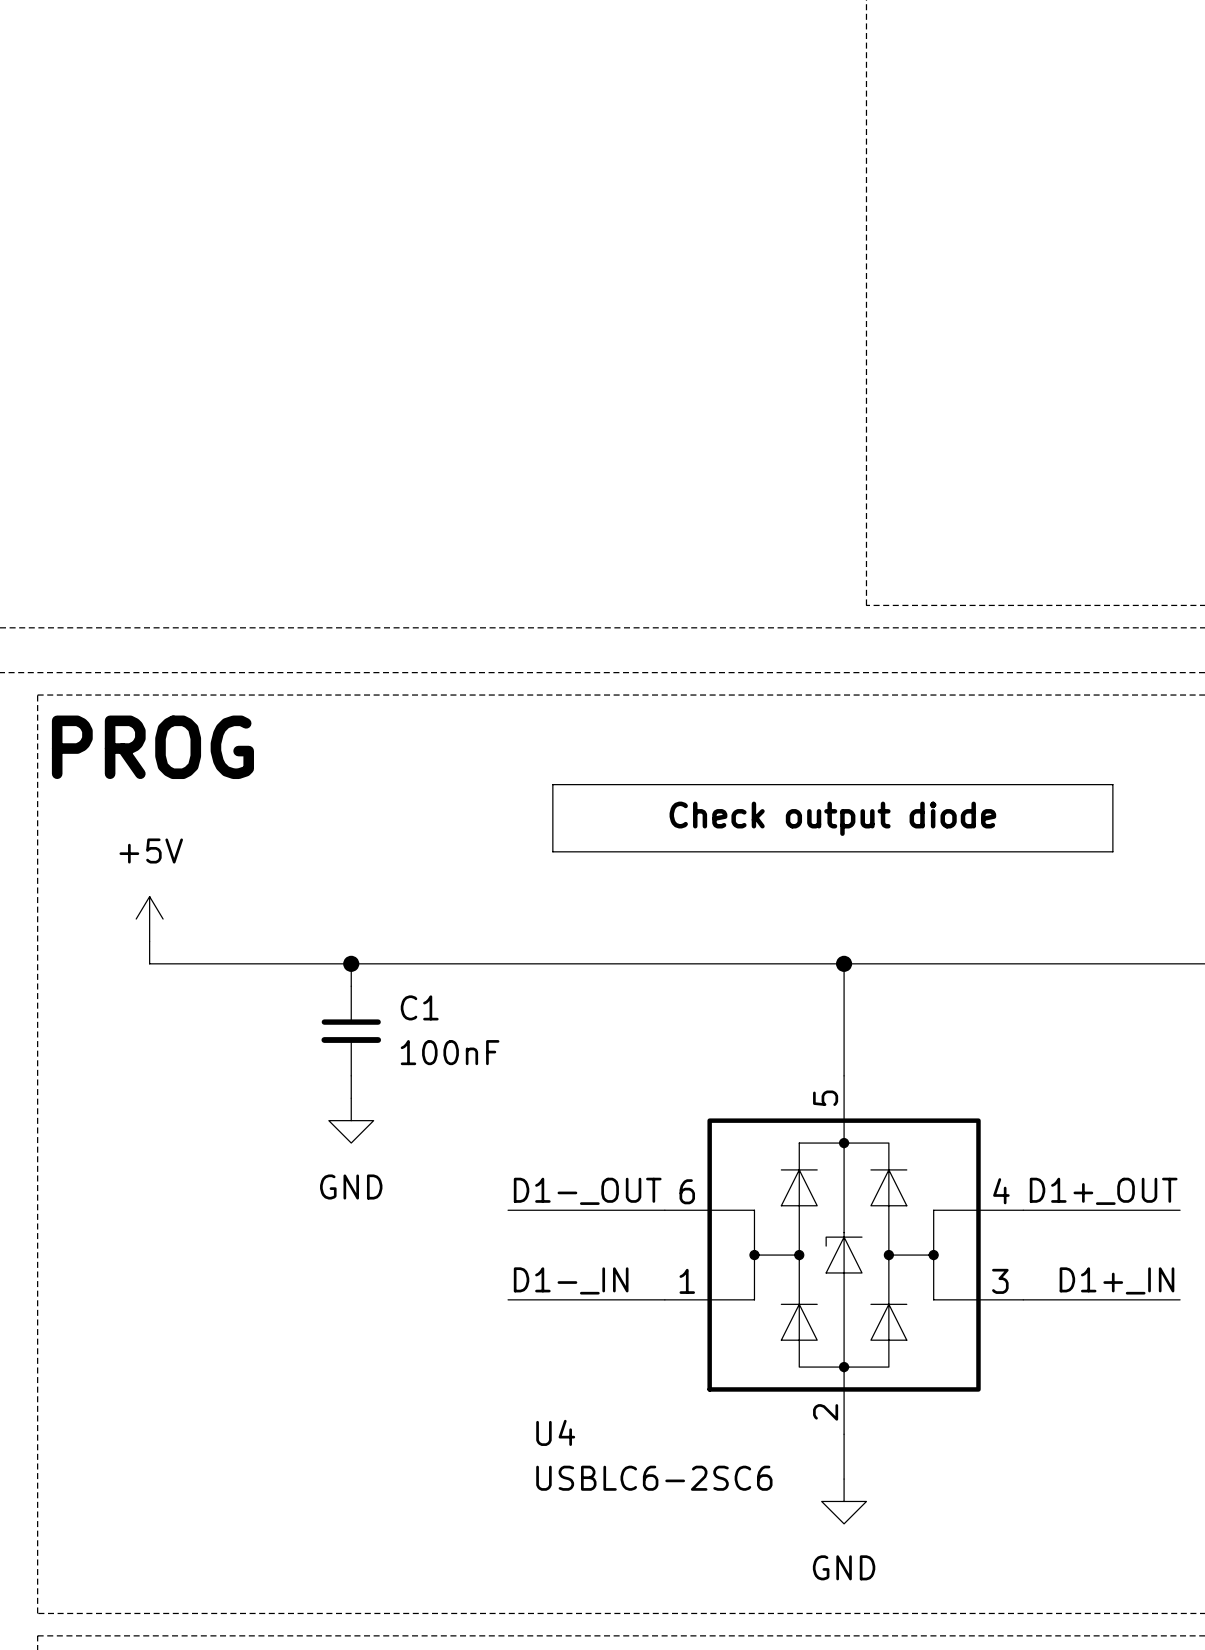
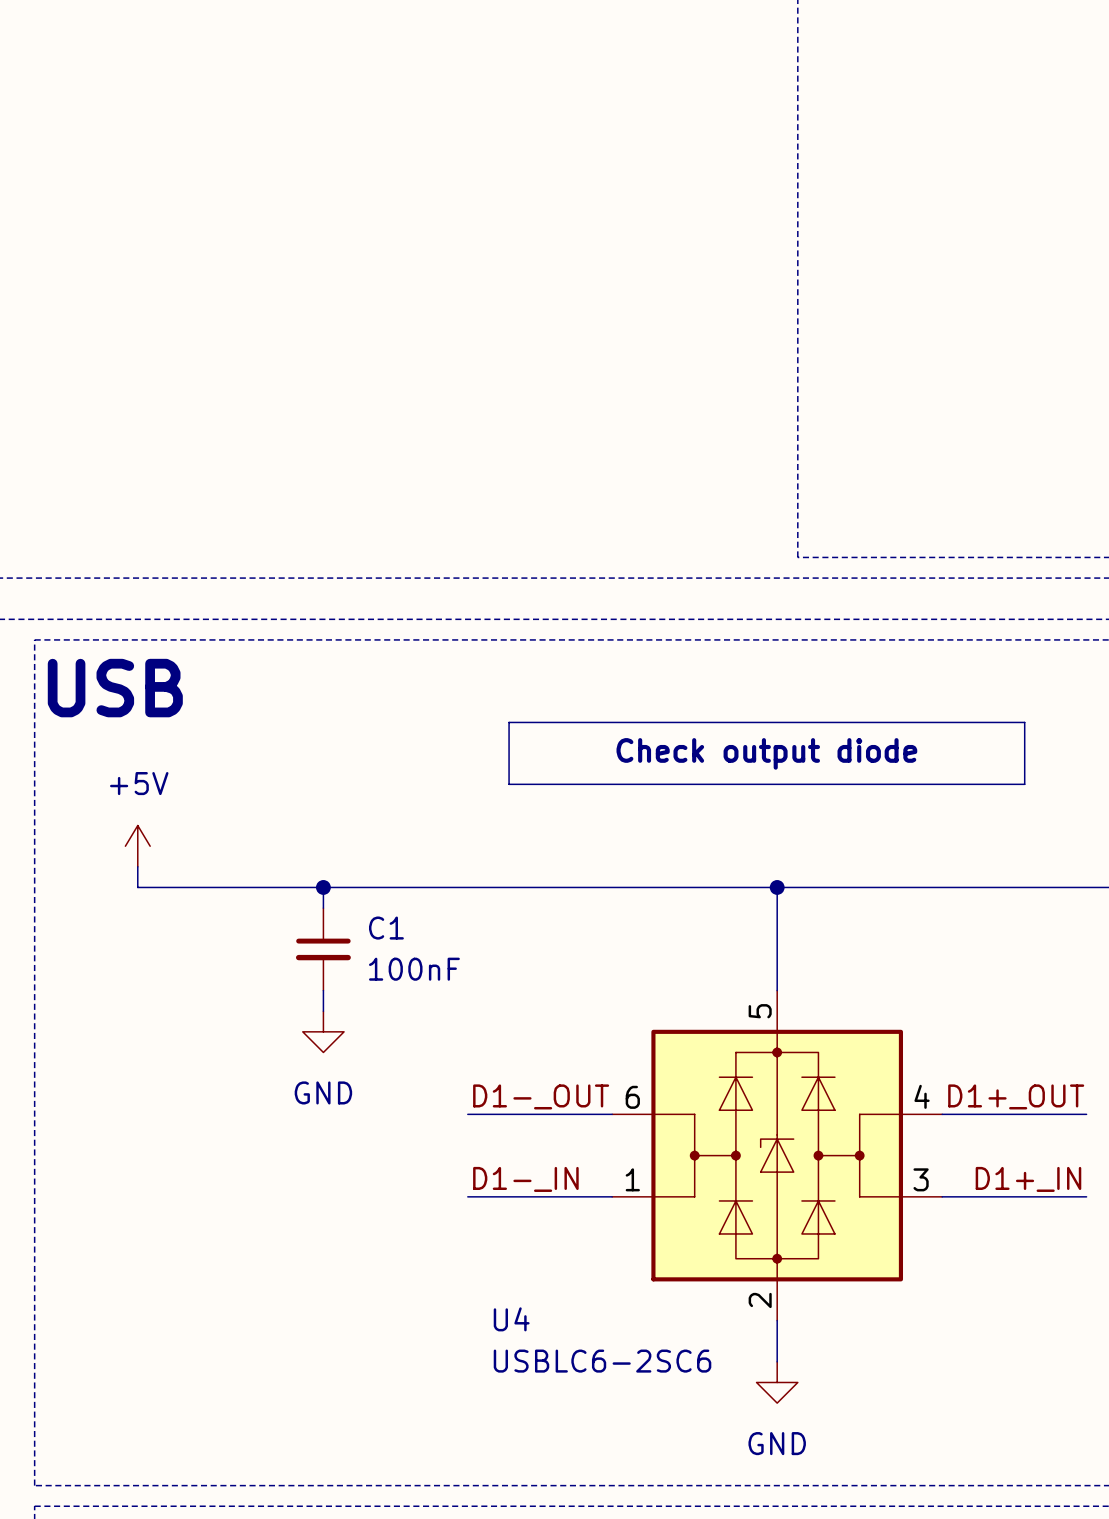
text: PROG (152, 747) -> USB (115, 688)

